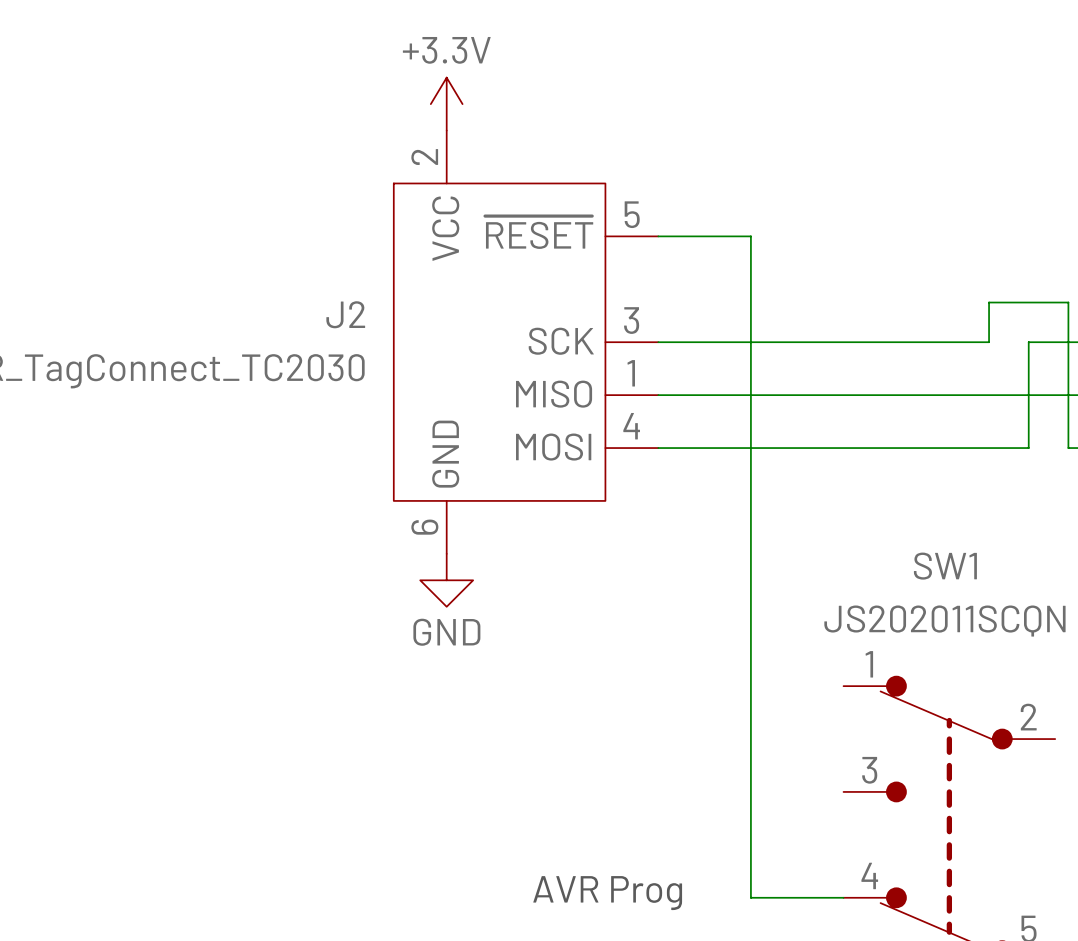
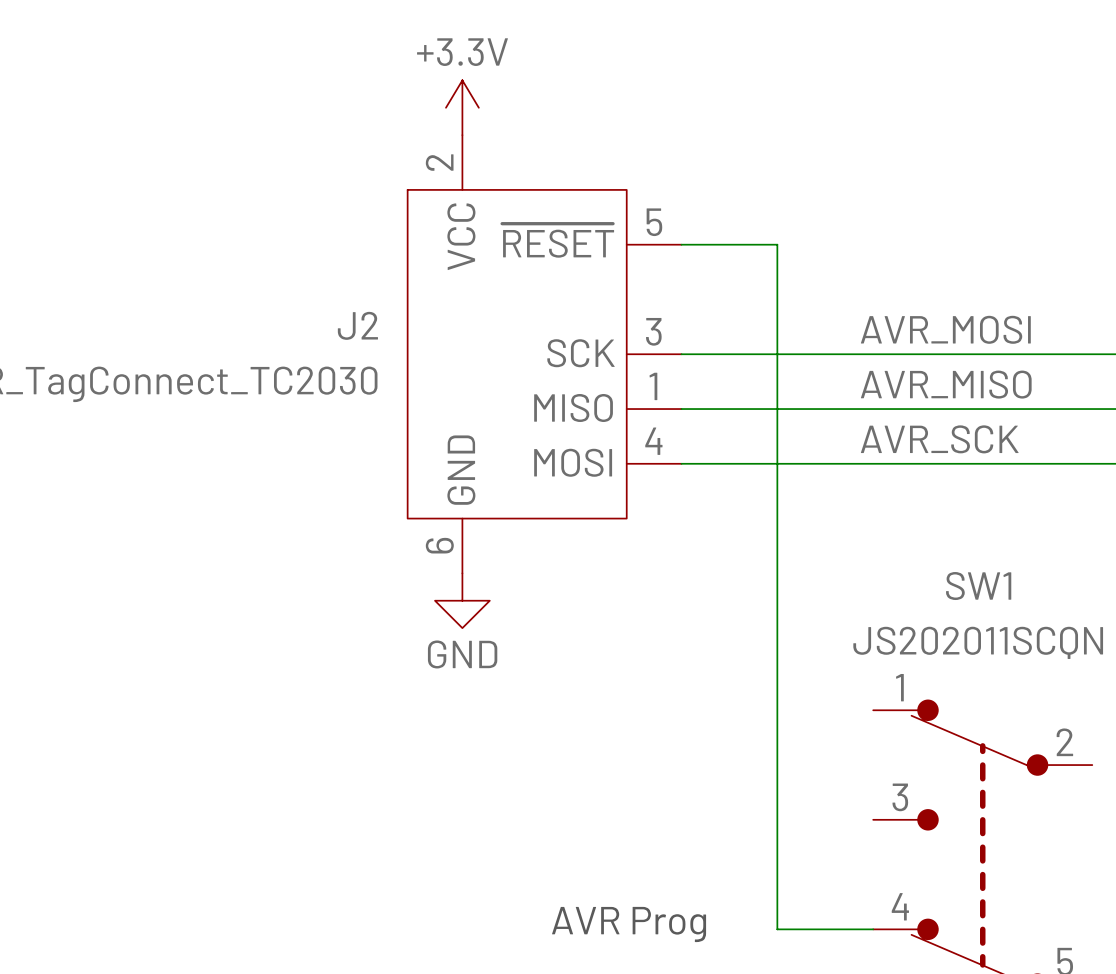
label: none -> AVR_MOSI (945, 329)
wire: (989, 342) (989, 302) (1068, 302) (1068, 448) -> (1023, 354) (1064, 354)
wire: (1028, 342) (1028, 448) -> (1105, 463) (1064, 463)
label: none -> AVR_MISO (946, 384)
label: none -> AVR_SCK (939, 439)

